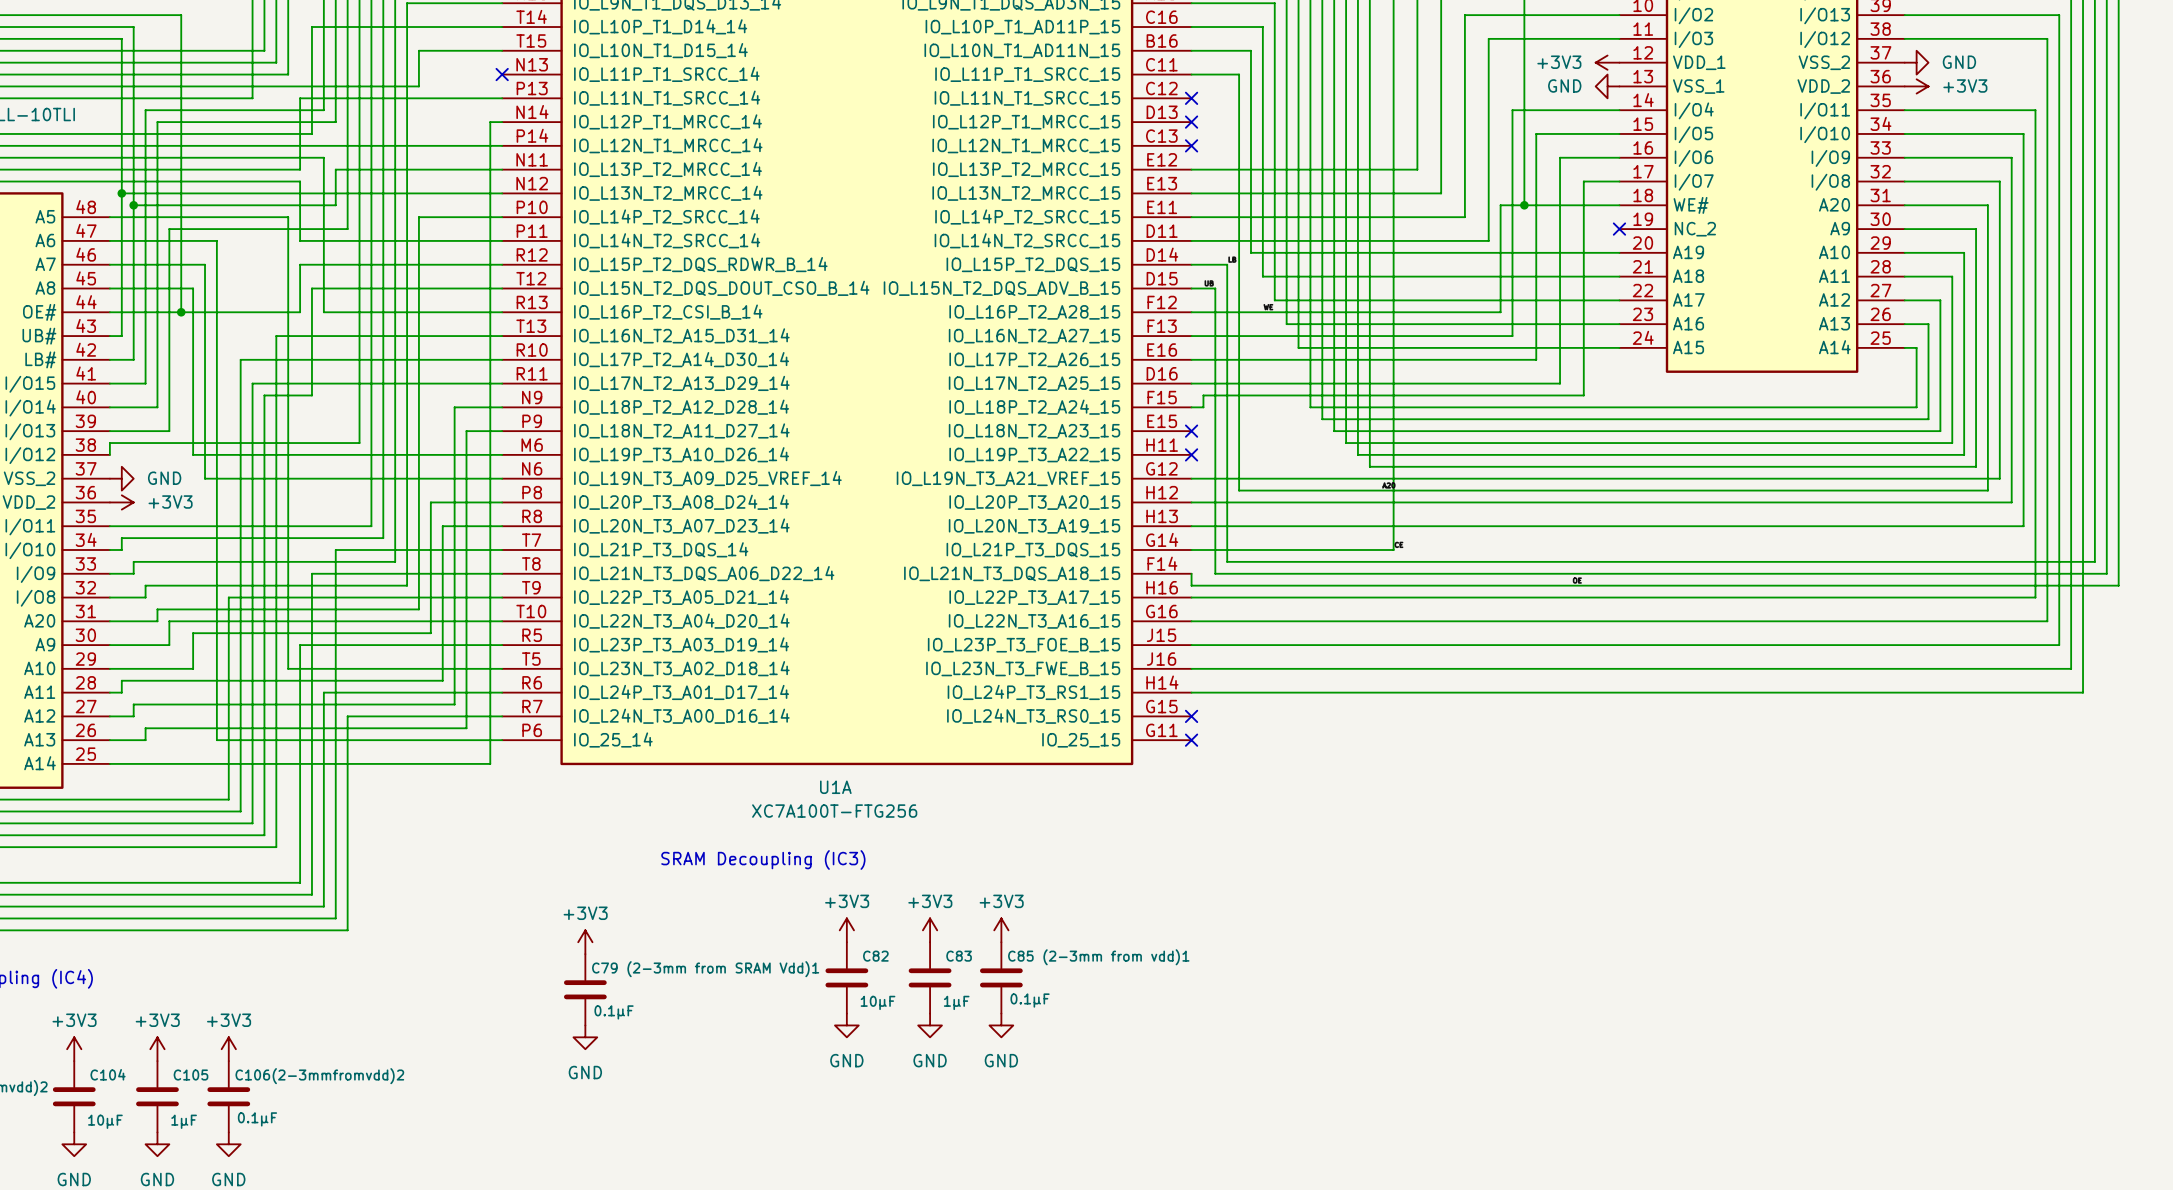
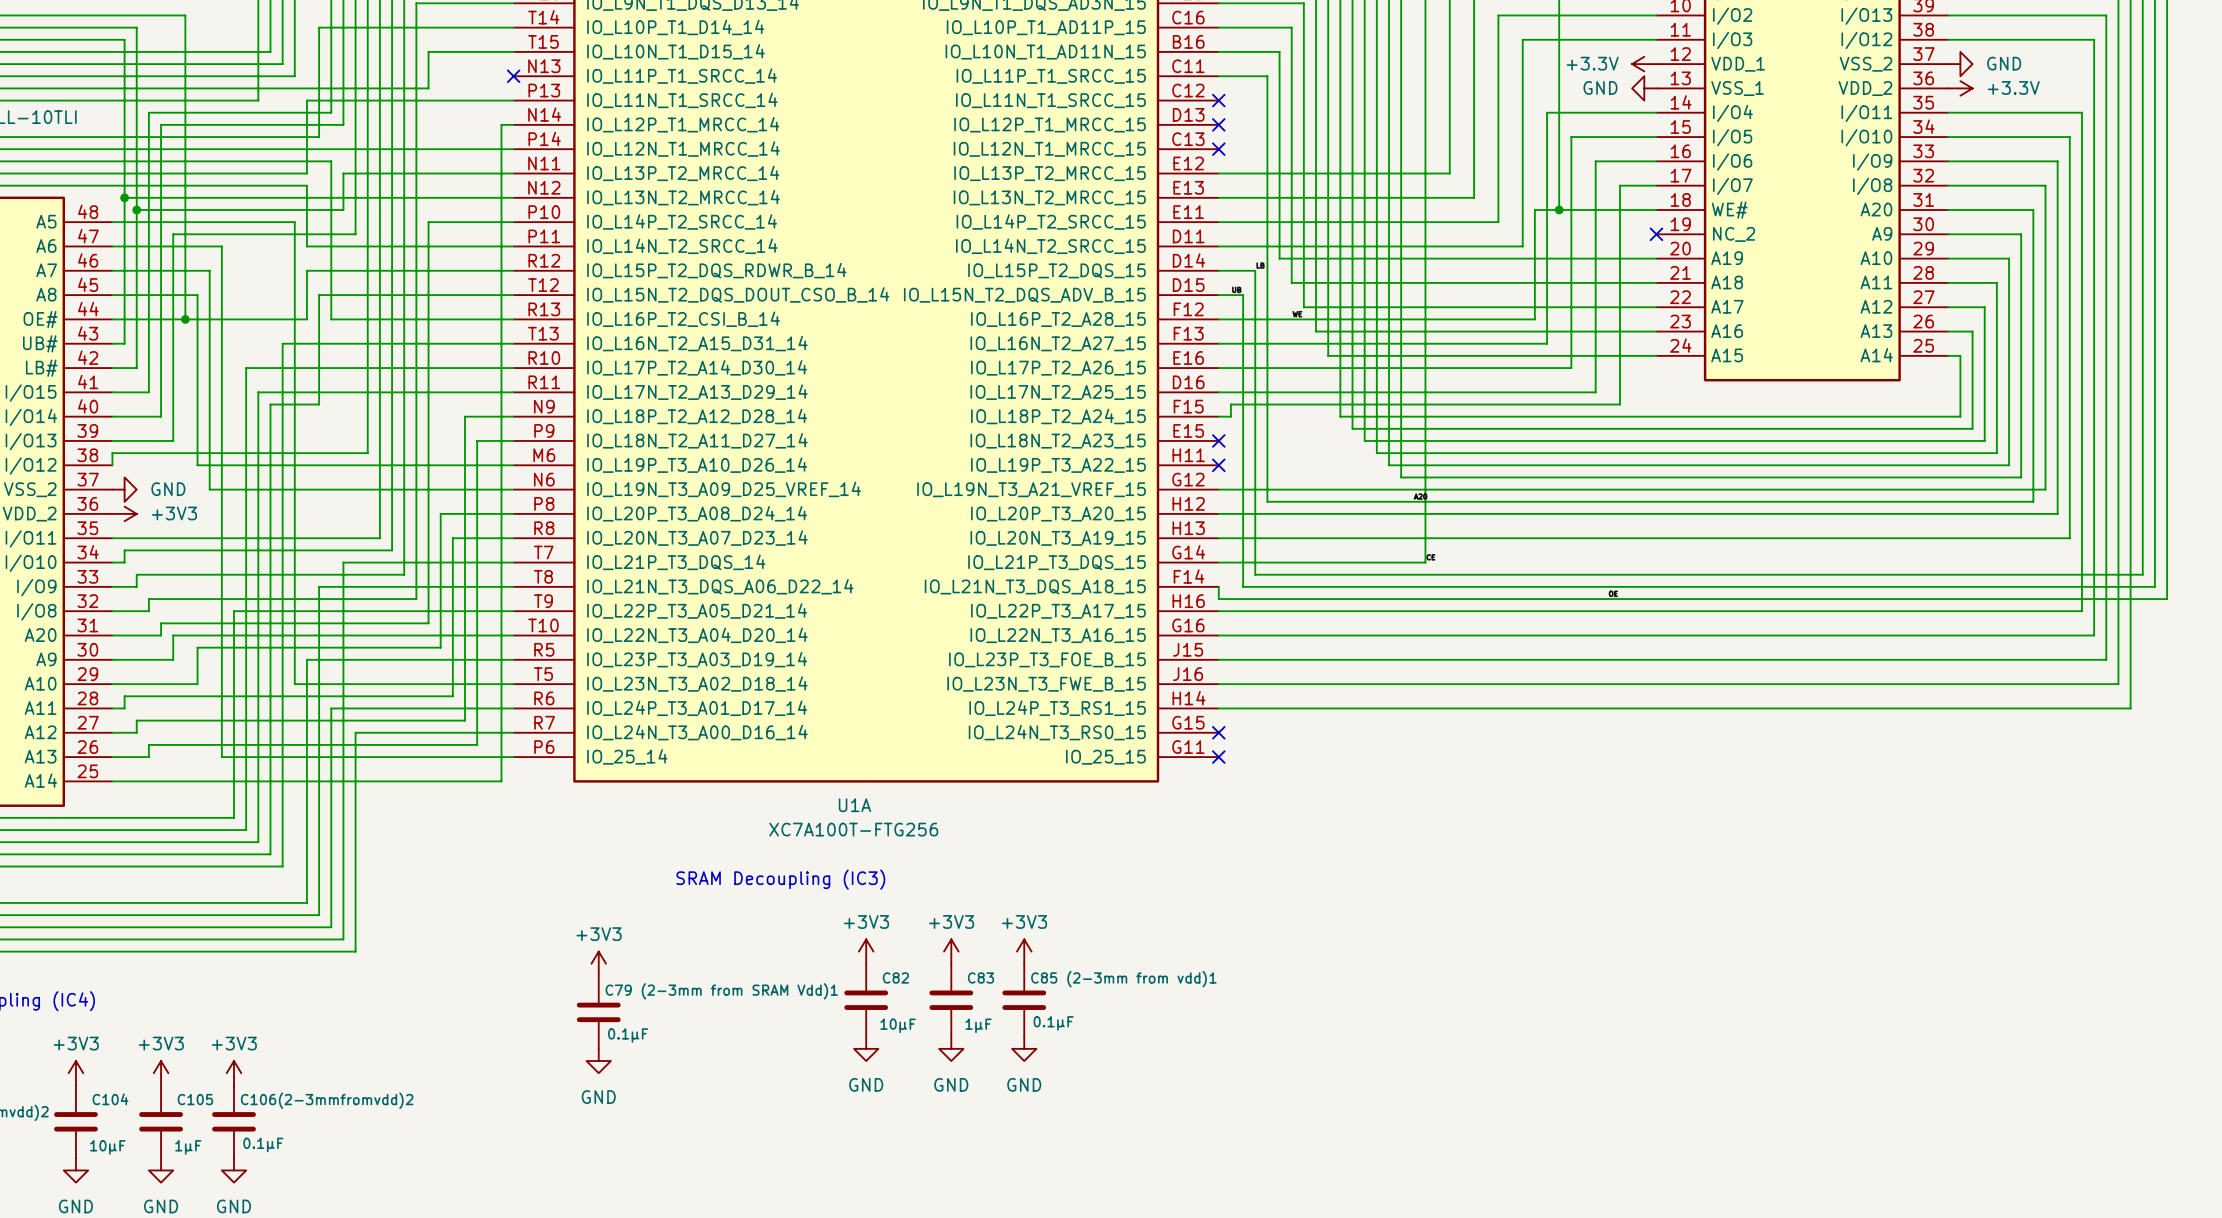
power symbol: +3V3 (1607, 62) -> +3.3V (1644, 64)
power symbol: +3V3 (1916, 86) -> +3.3V (1960, 88)

